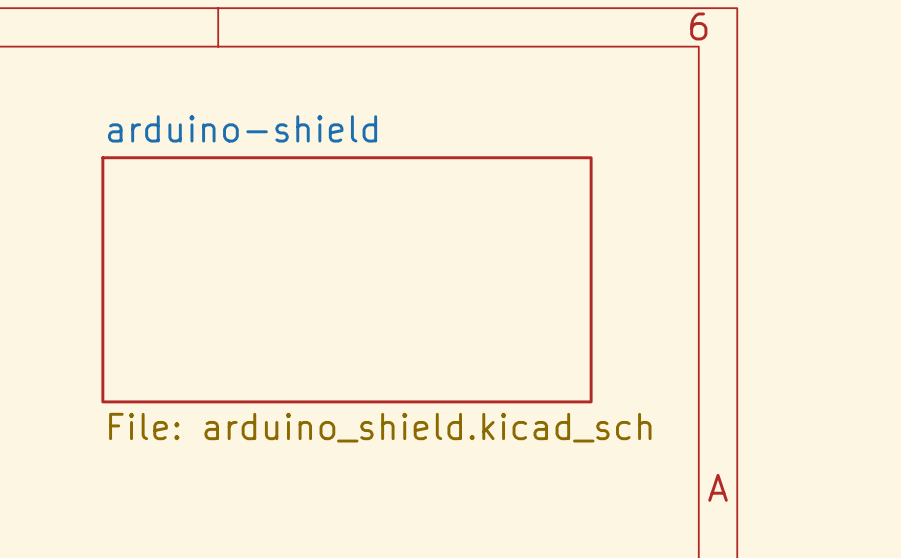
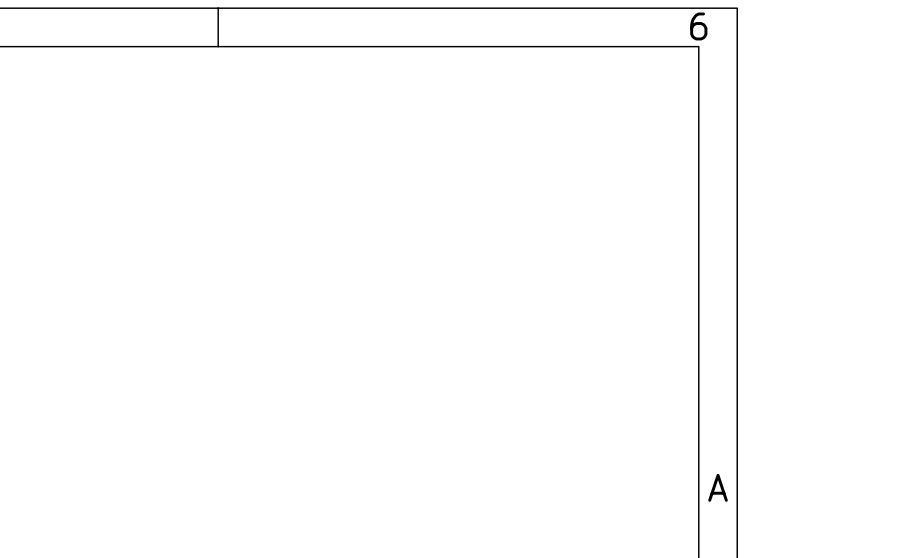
sheet arduino-shield: File: arduino_shield.kicad_sch (346, 279) -> none

